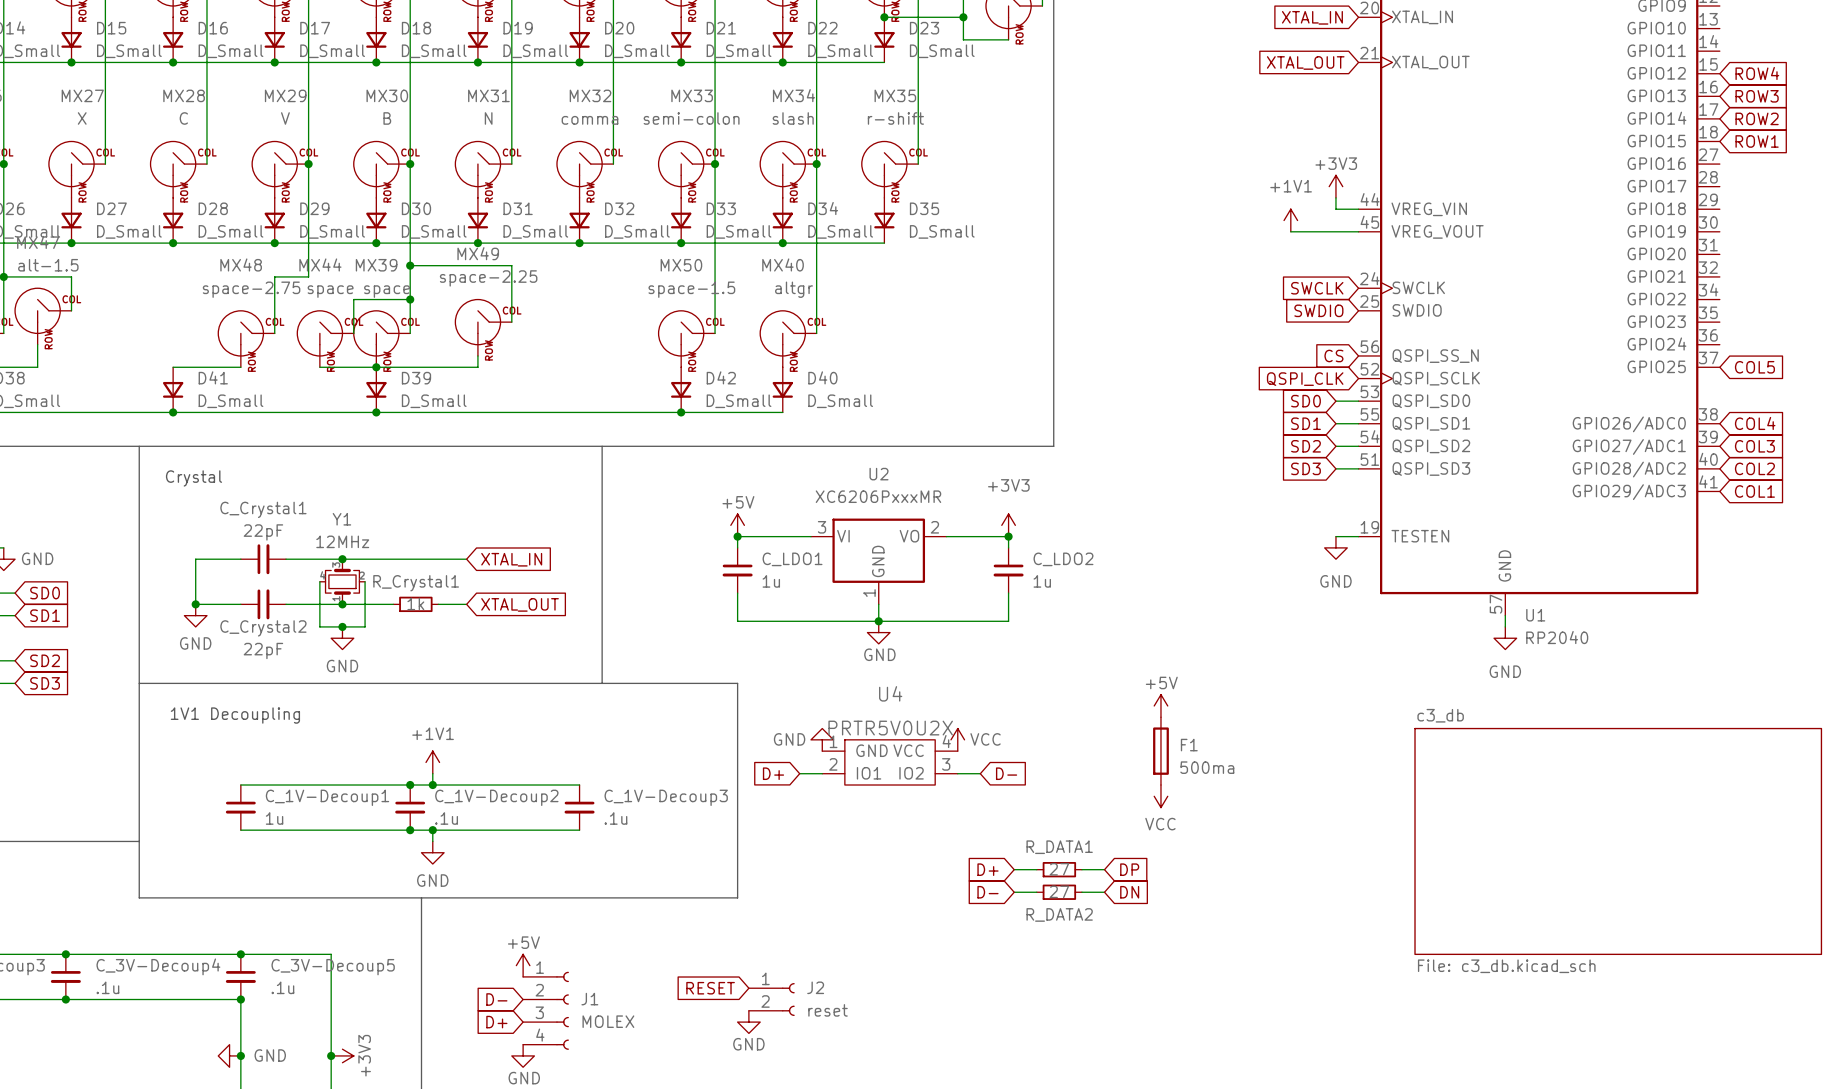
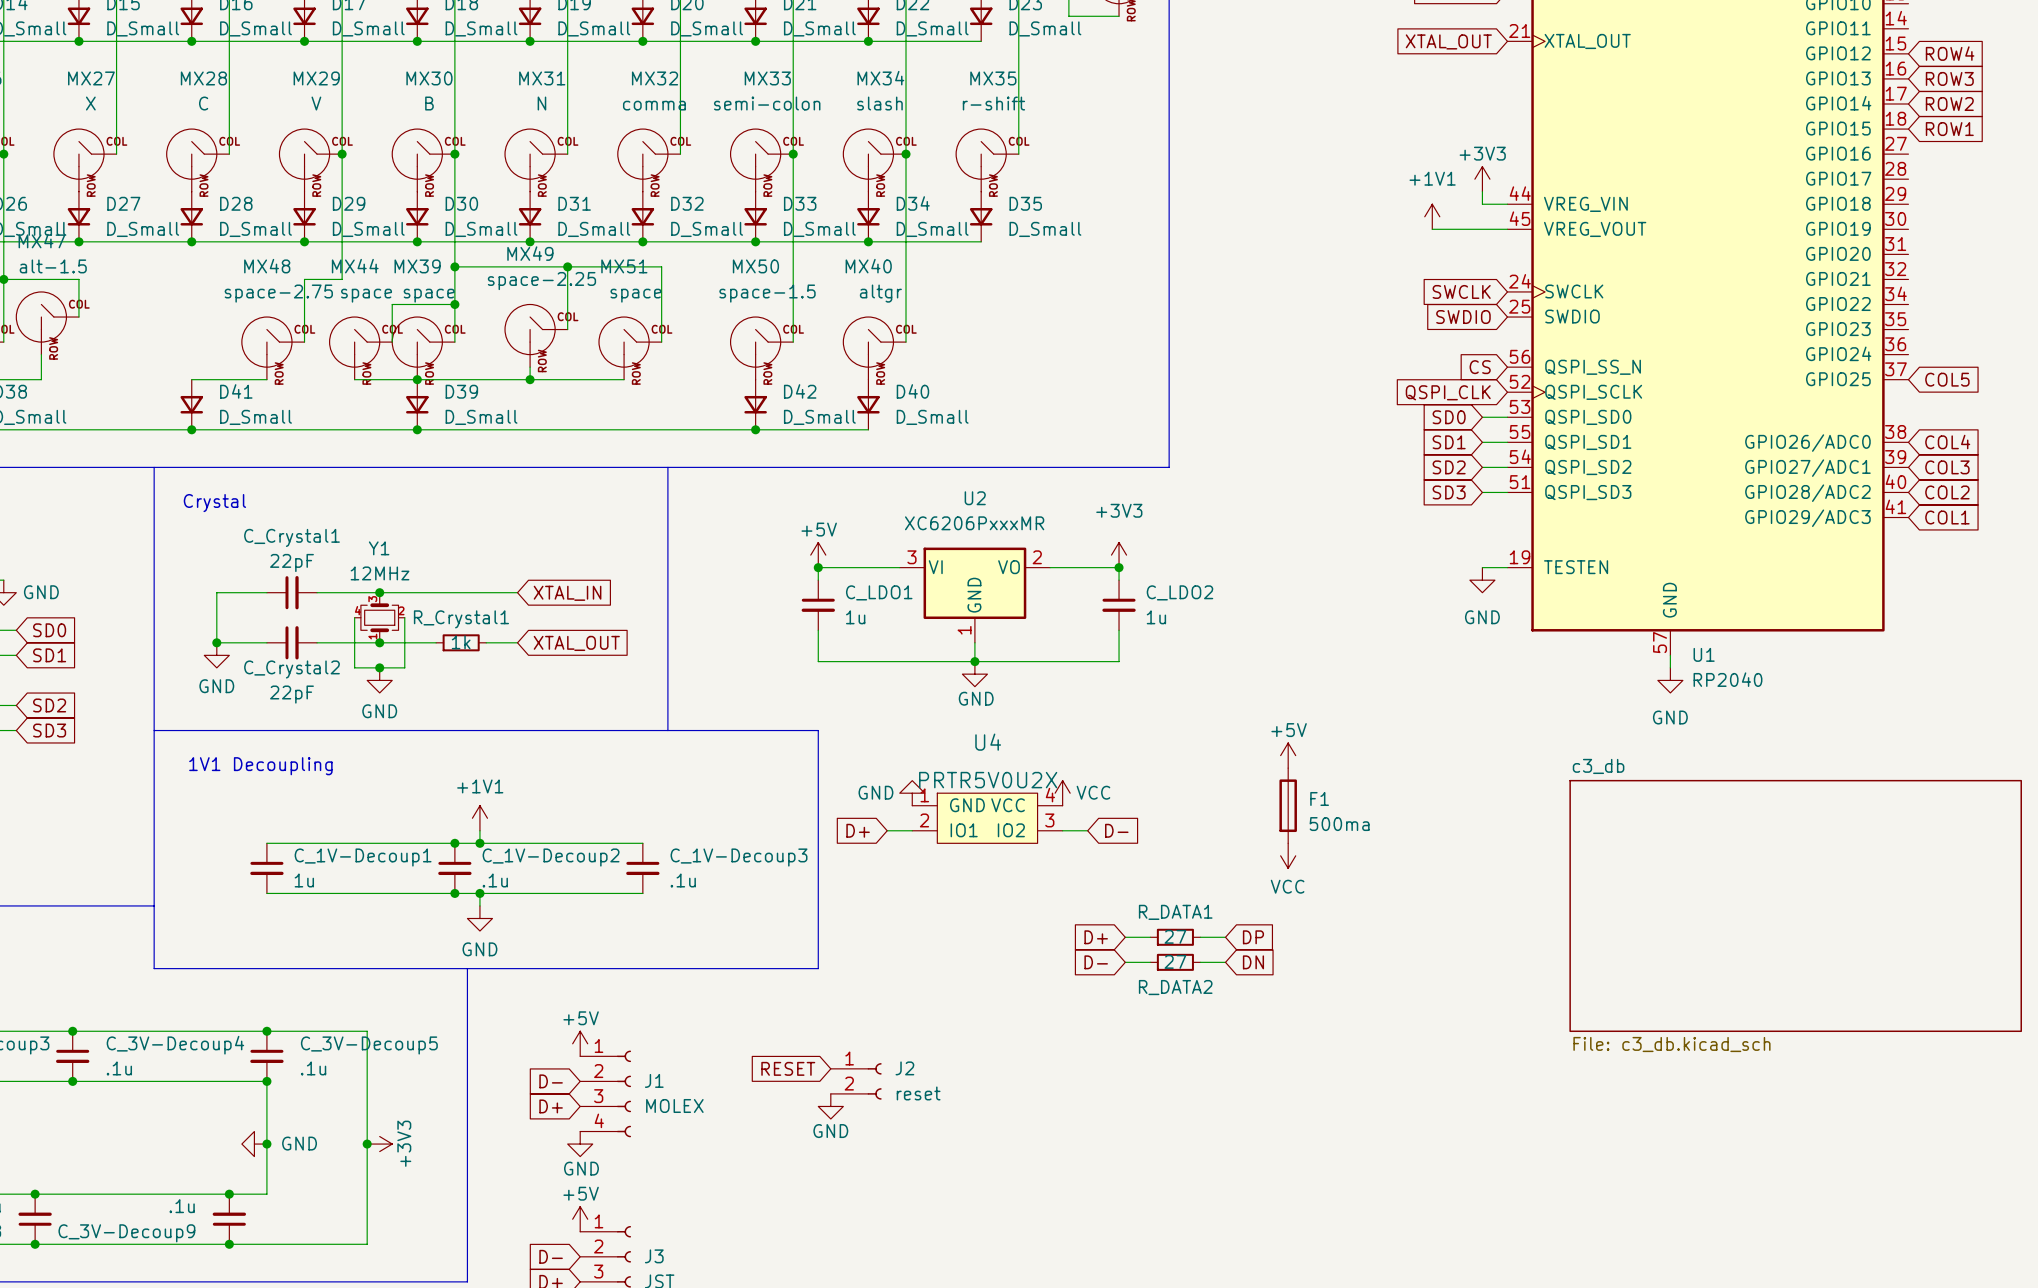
wire: none -> (567, 266) (661, 266) (661, 342)
junction: none -> (567, 266)
MX51: none -> space (630, 348)
wire: none -> (530, 379) (624, 379)
junction: none -> (530, 379)

